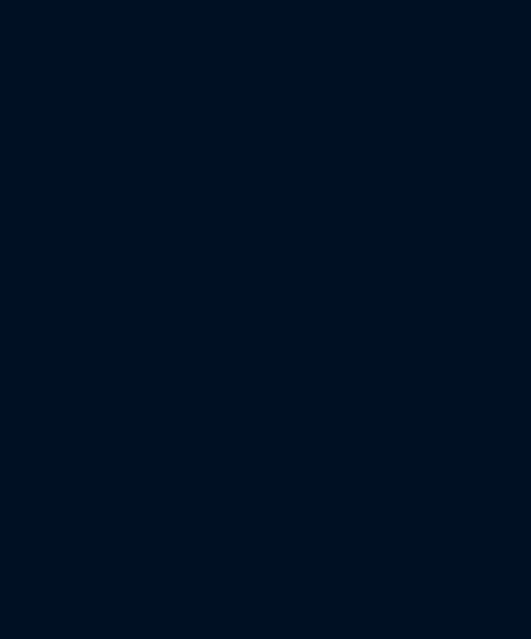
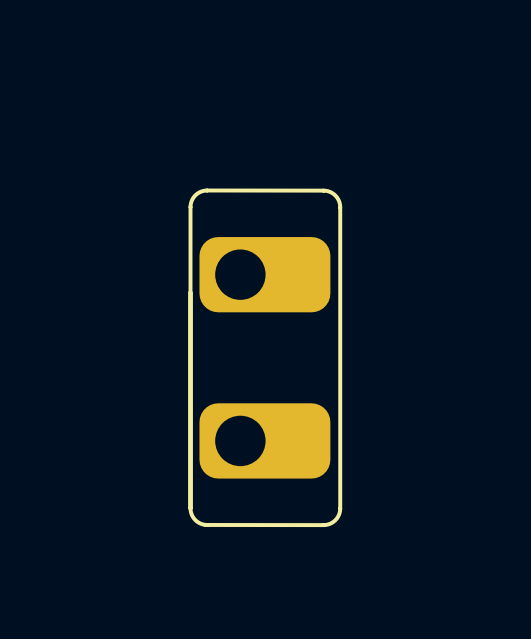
part: none -> (265, 357)

